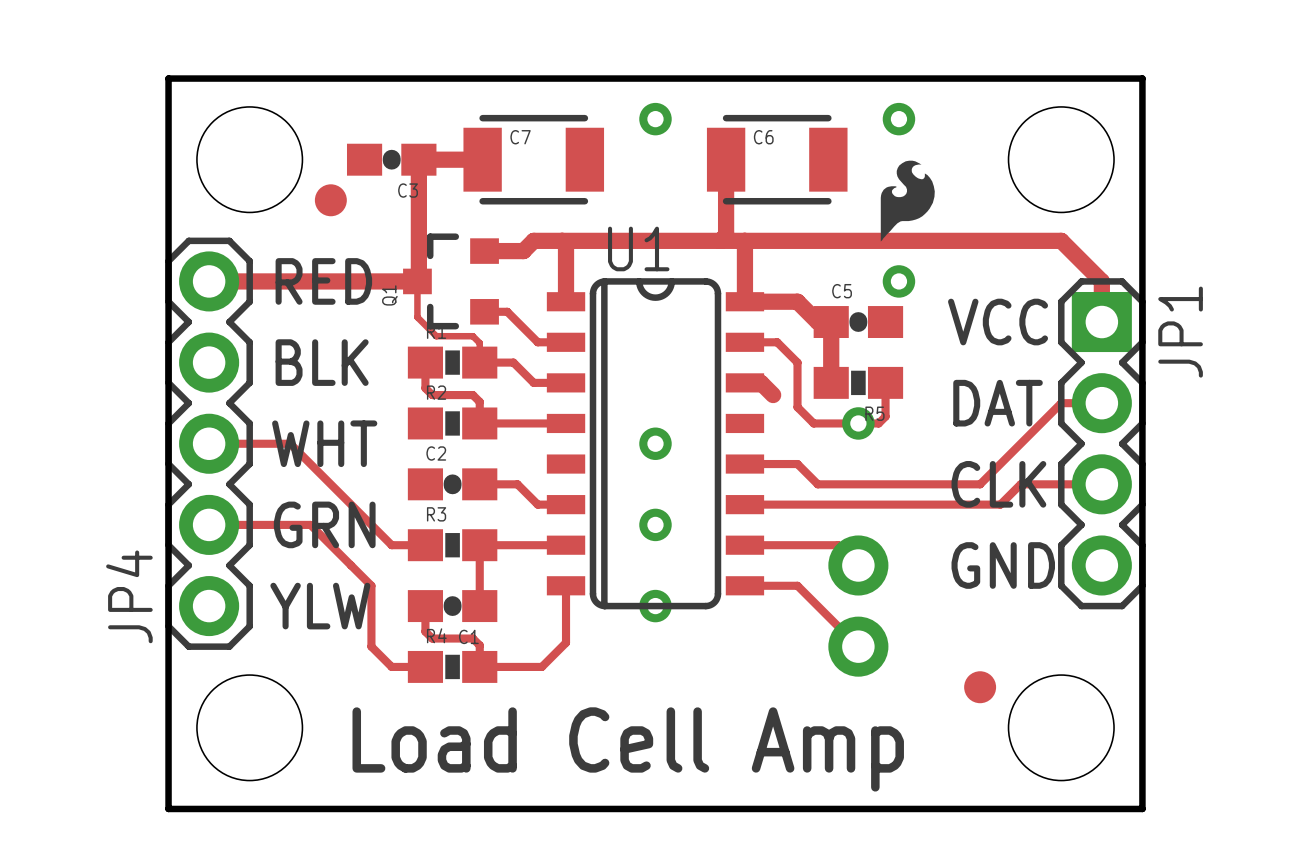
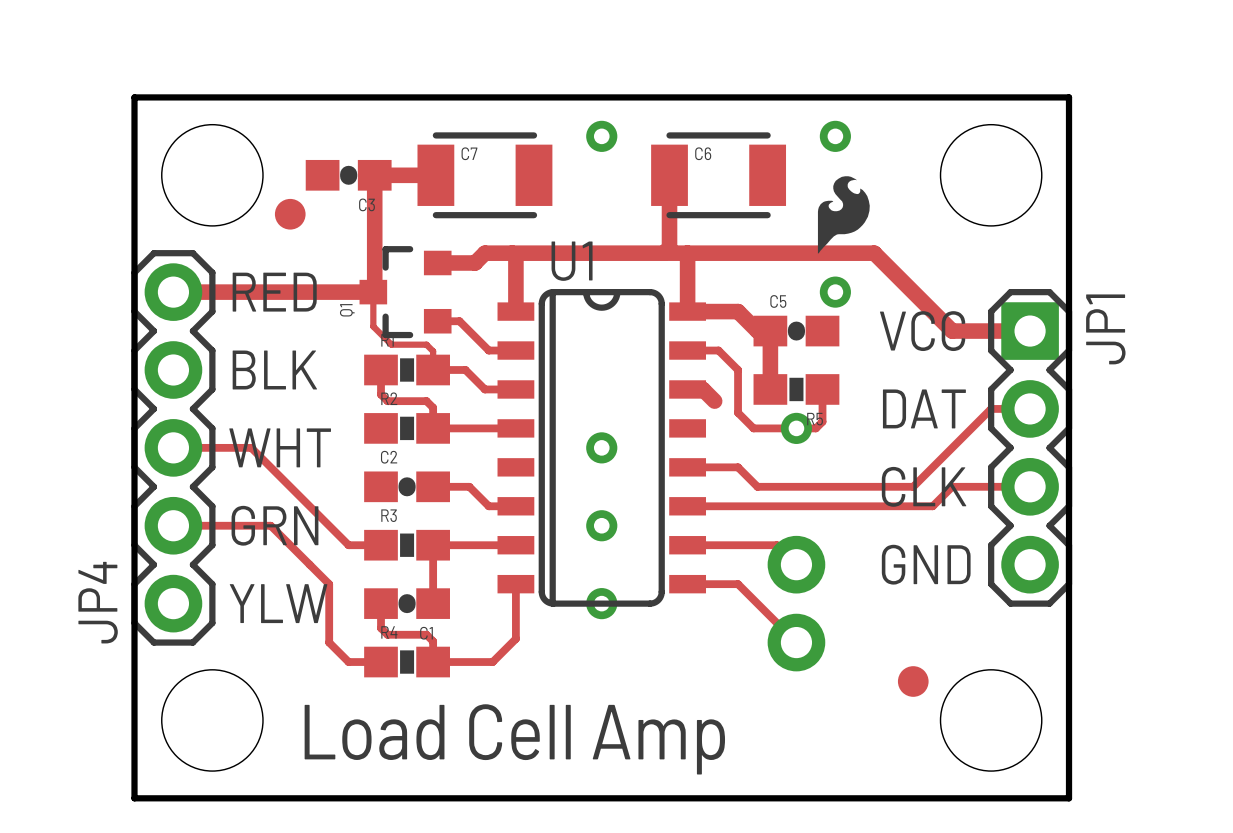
track: (939, 240) (1061, 240) (1101, 281) (1101, 322) -> (874, 253) (952, 331) (1030, 331)

